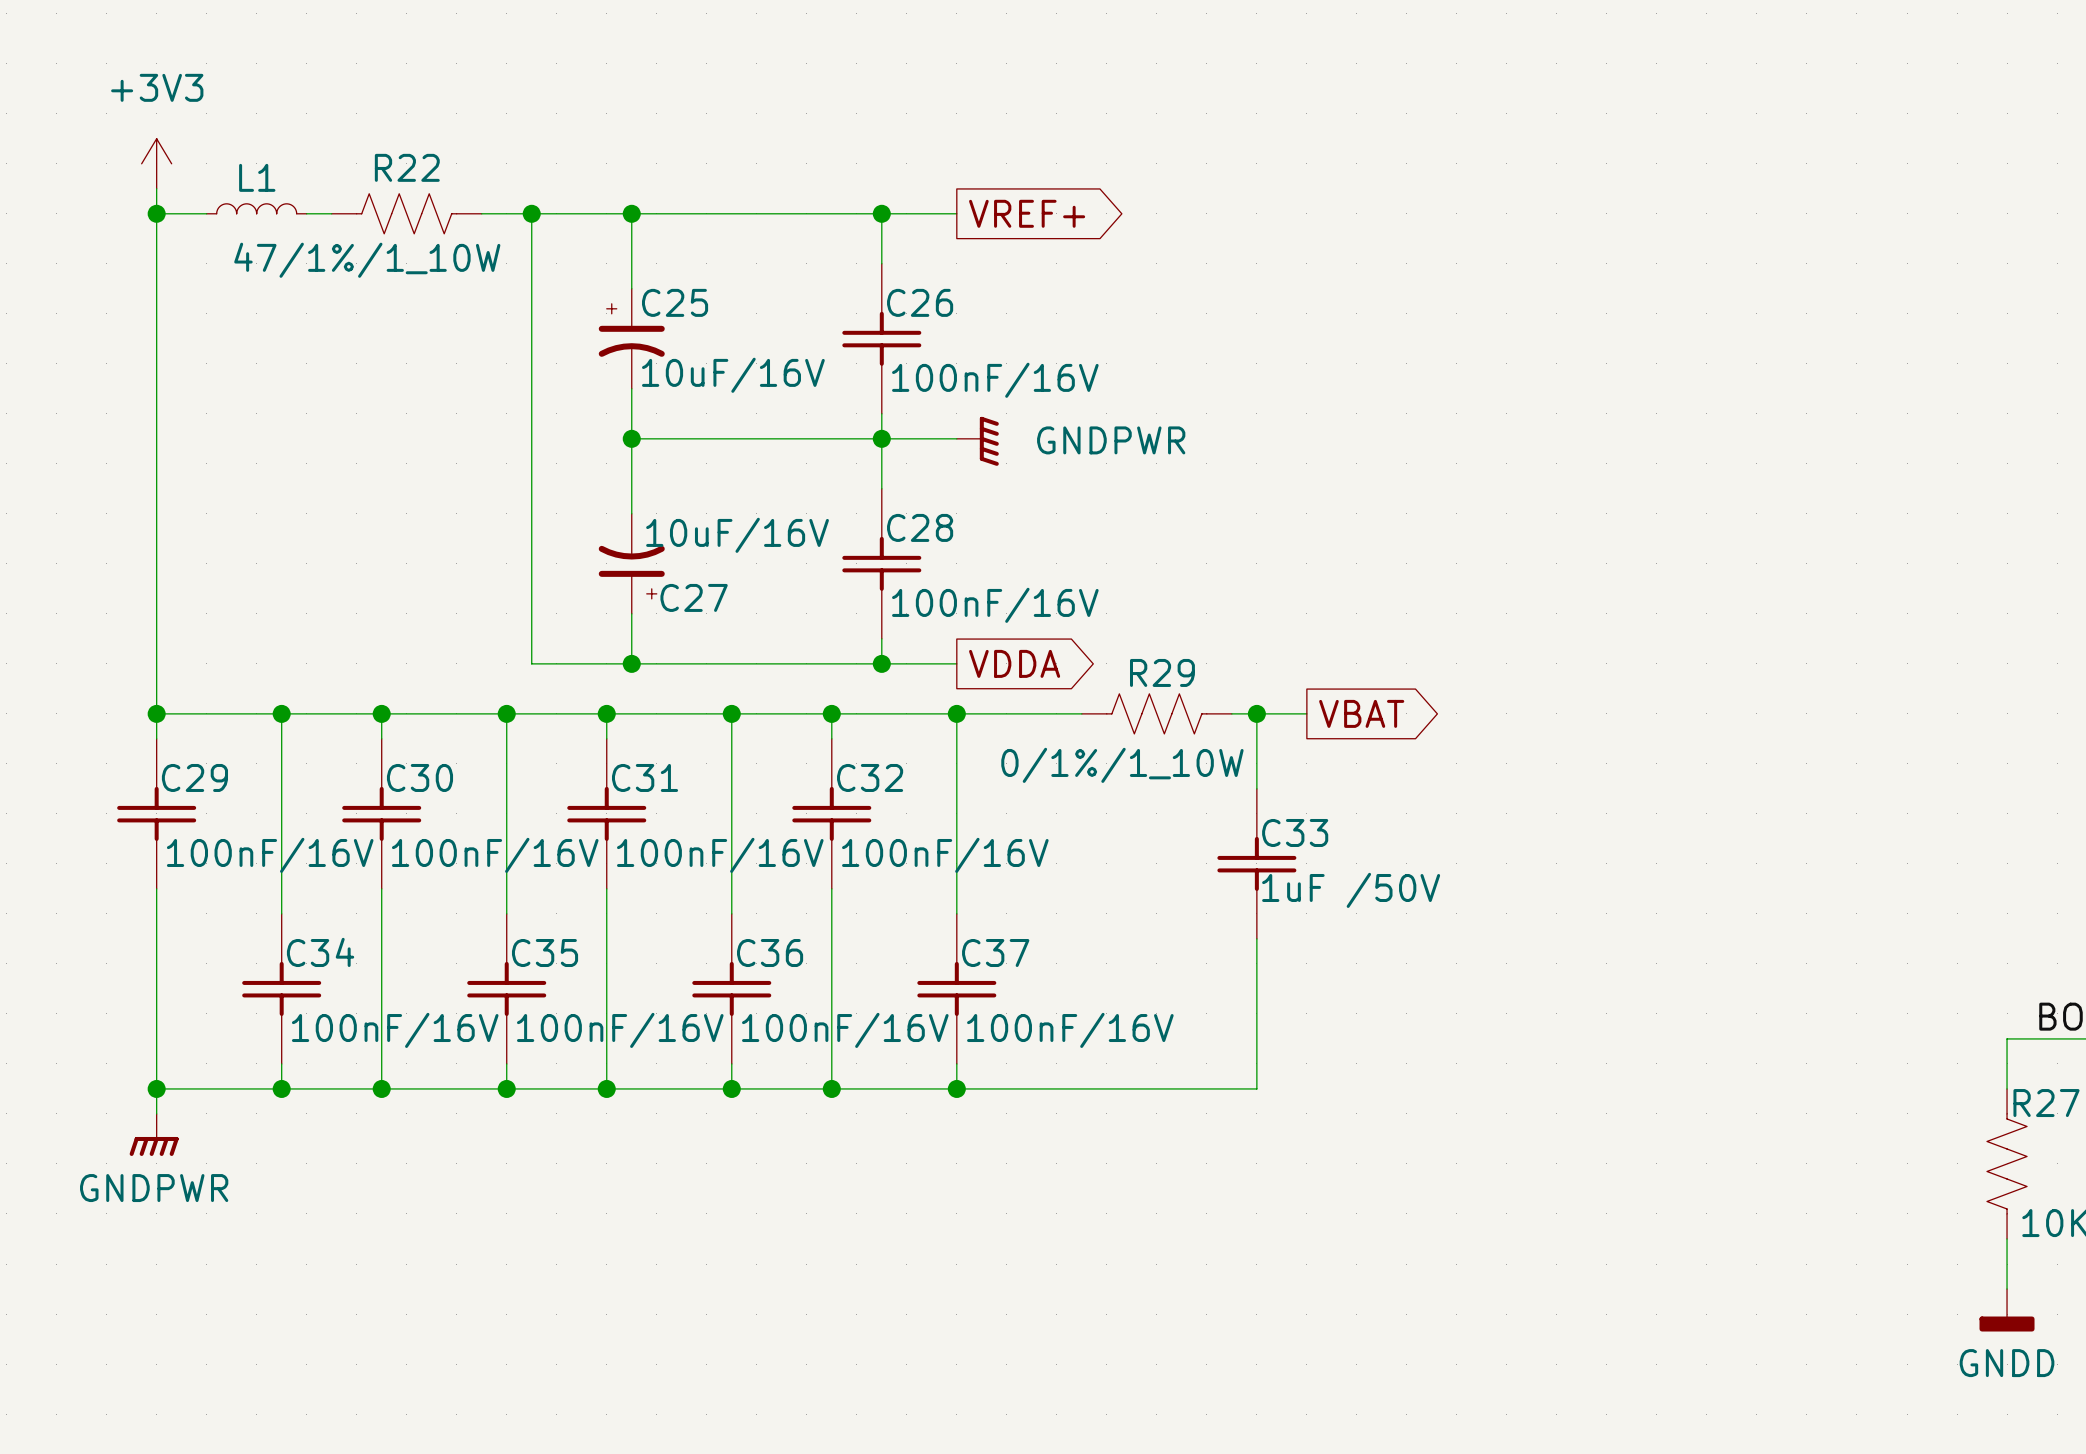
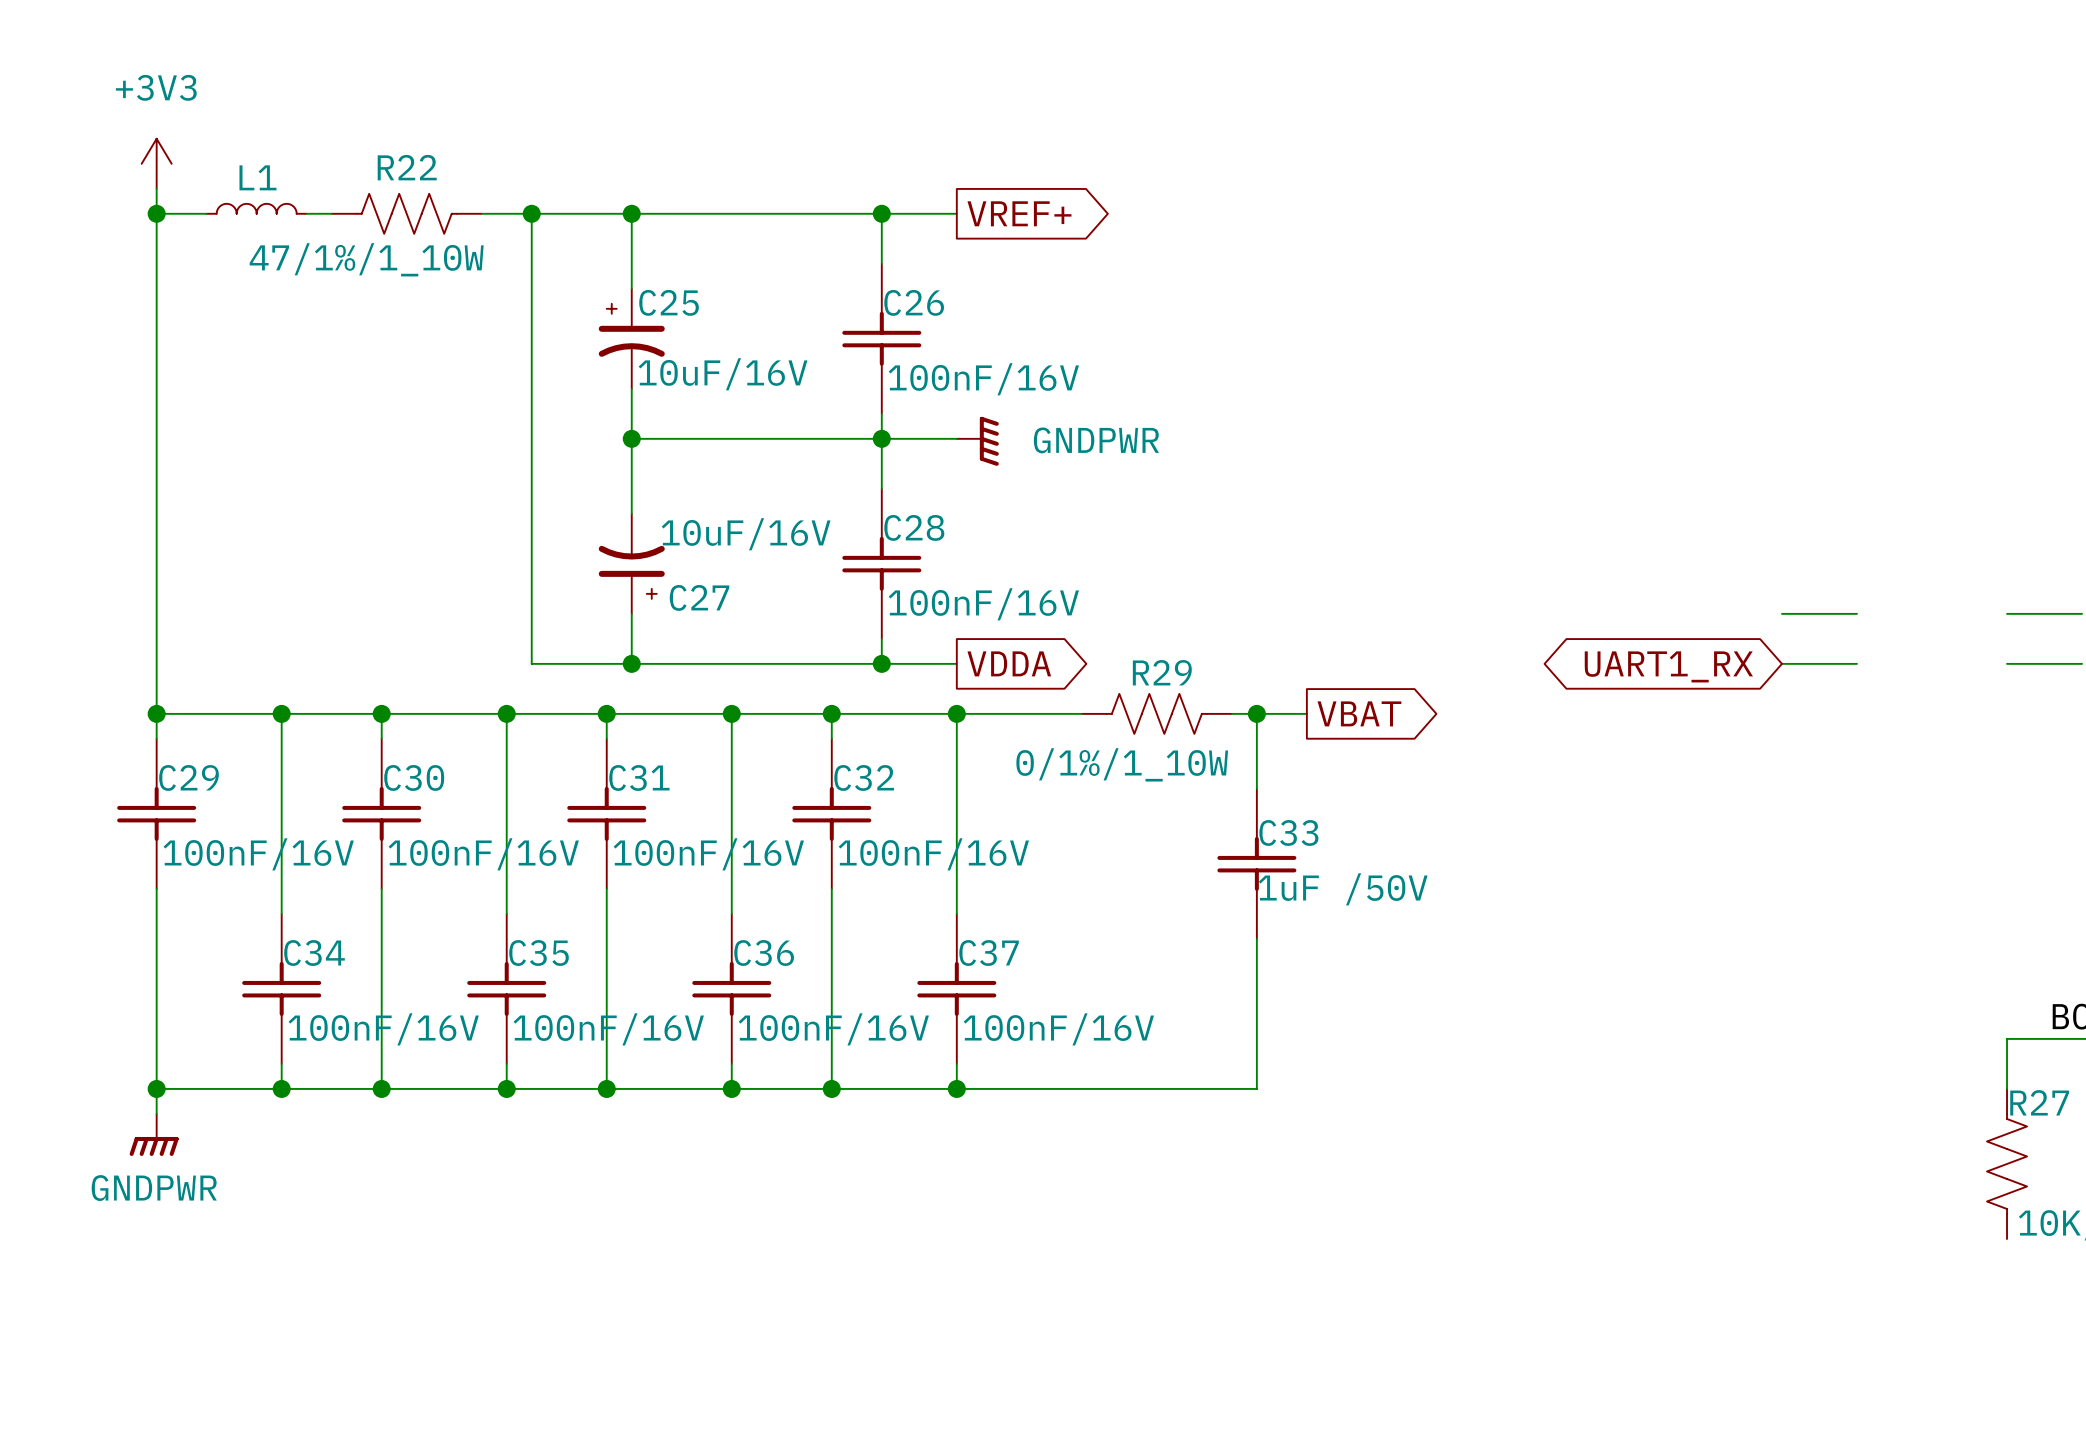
wire: none -> (1781, 613) (1856, 613)
wire: none -> (2007, 613) (2082, 613)
wire: none -> (1781, 663) (1856, 663)
wire: none -> (2007, 663) (2082, 663)
global label: none -> UART1_RX (1668, 666)
wire: (2007, 1238) (2007, 1289) -> none
power symbol: GNDD (2007, 1310) -> none

